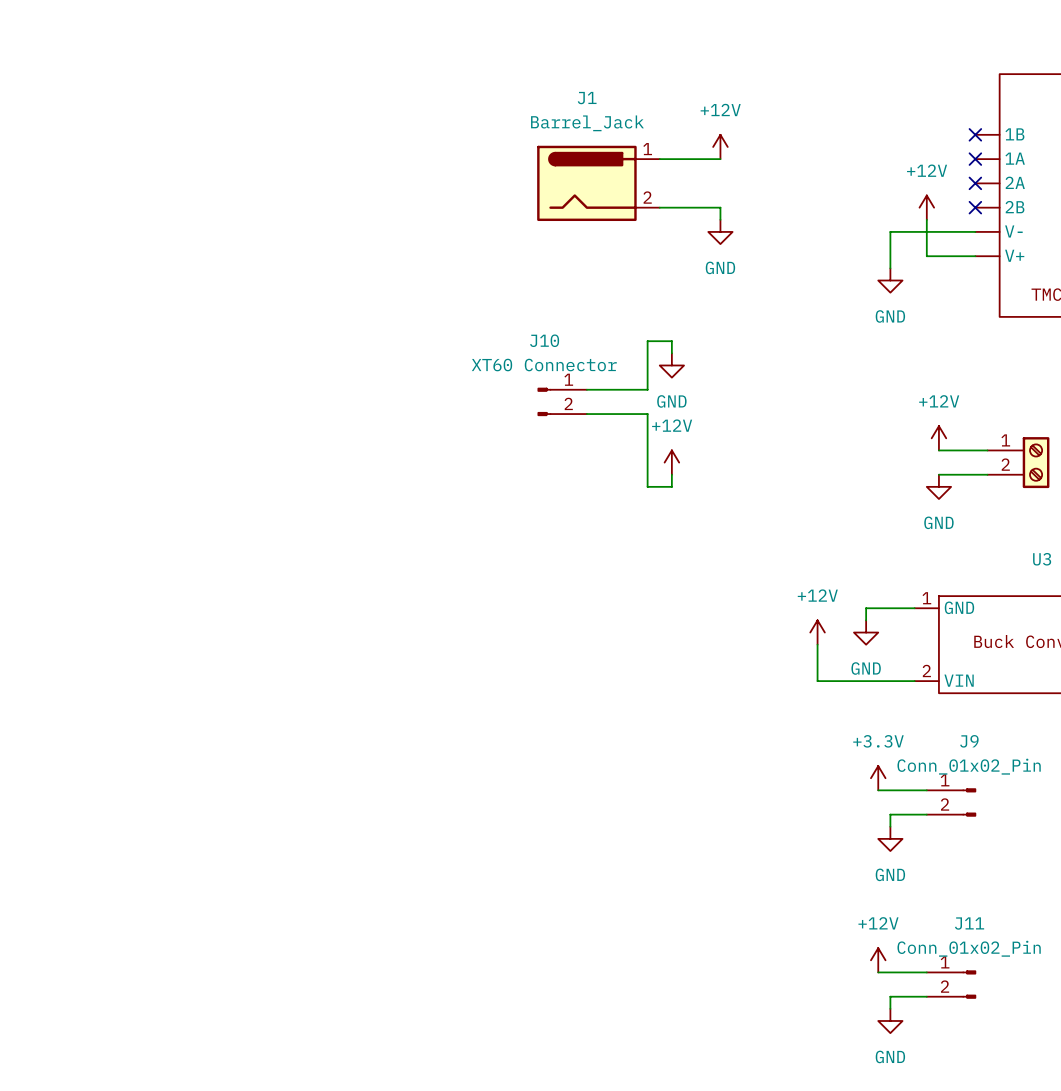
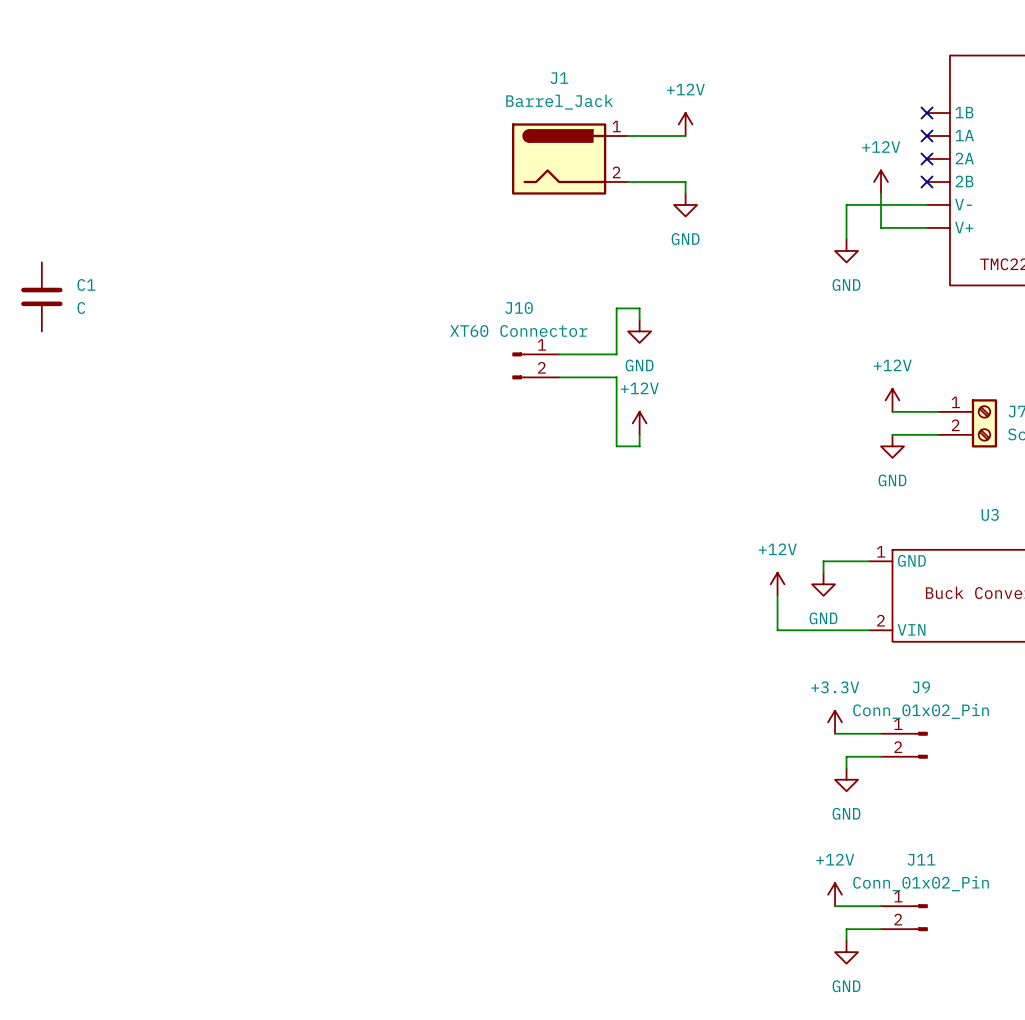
C1: none -> C (41, 296)

